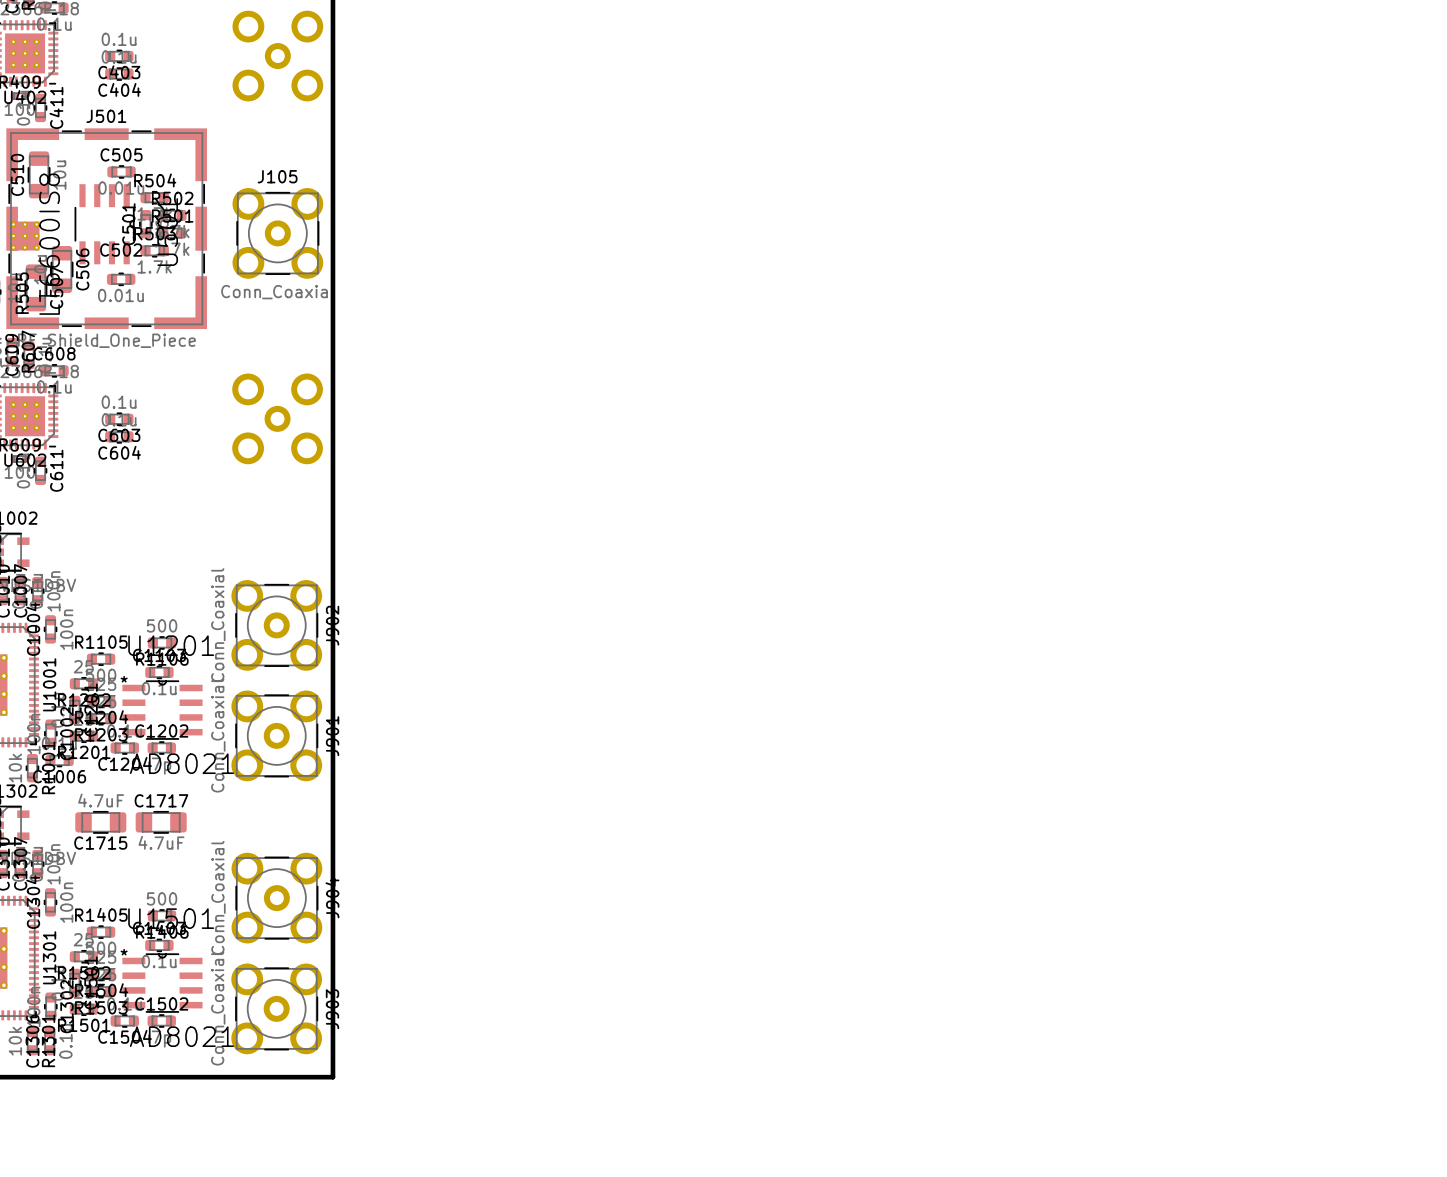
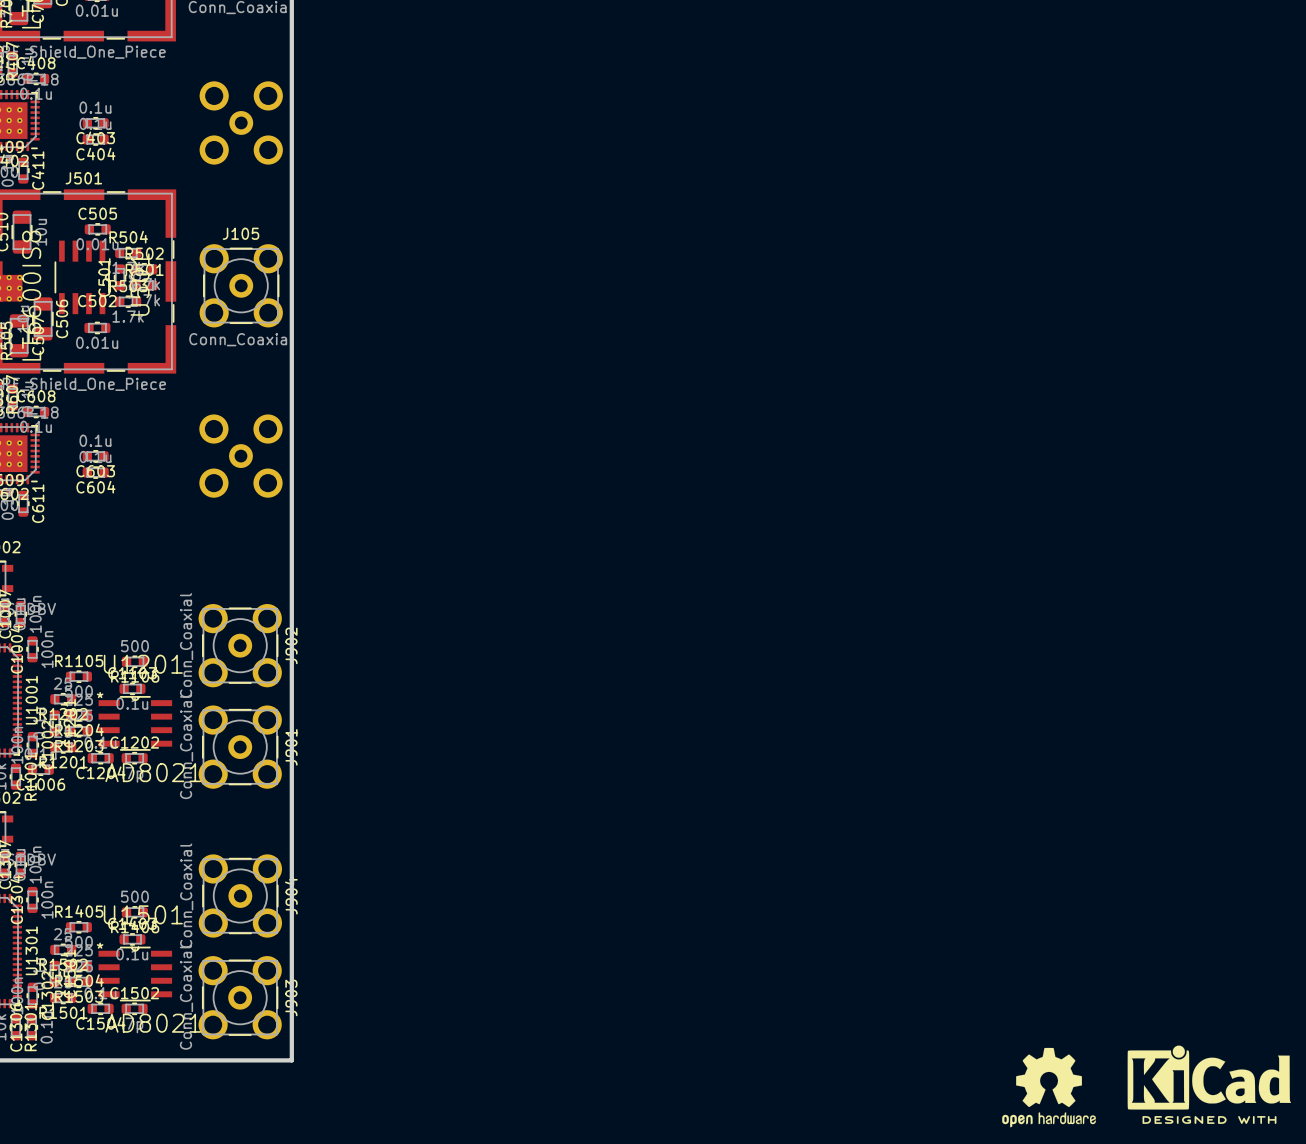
C1715: 4.7uF (100, 822) -> none
C1717: 4.7uF (161, 822) -> none
drawing: none -> [1127, 1045, 1292, 1124]
drawing: none -> [1002, 1047, 1096, 1128]

